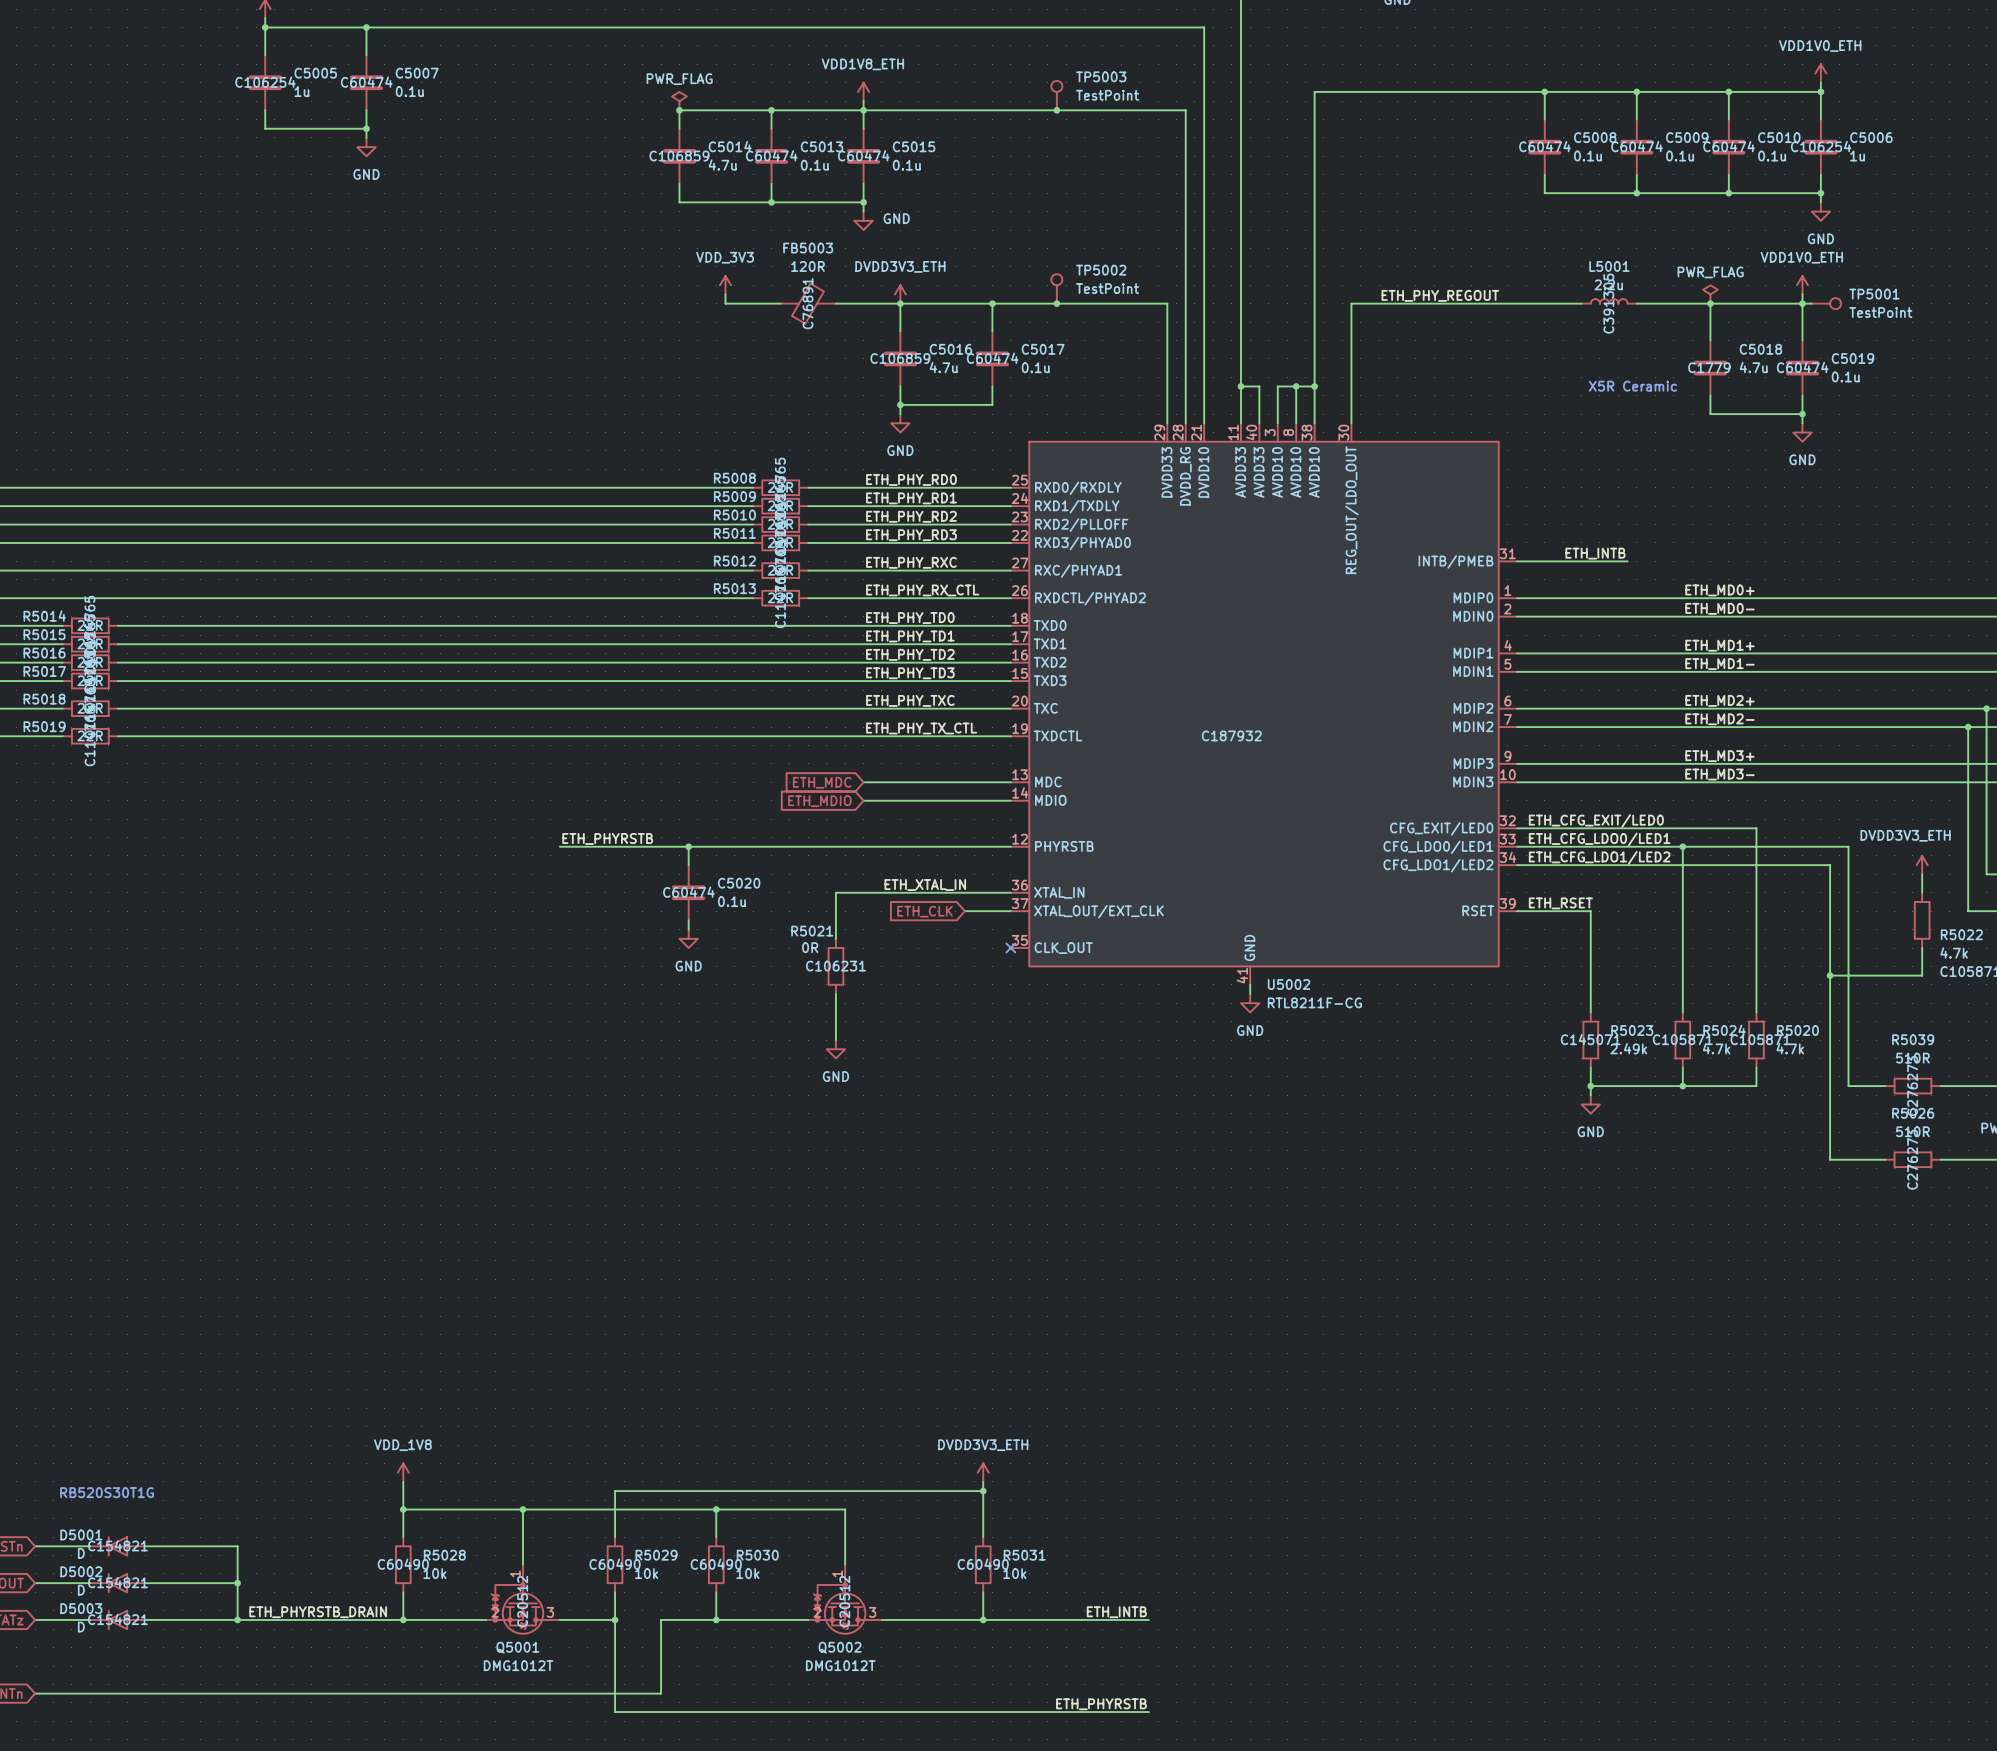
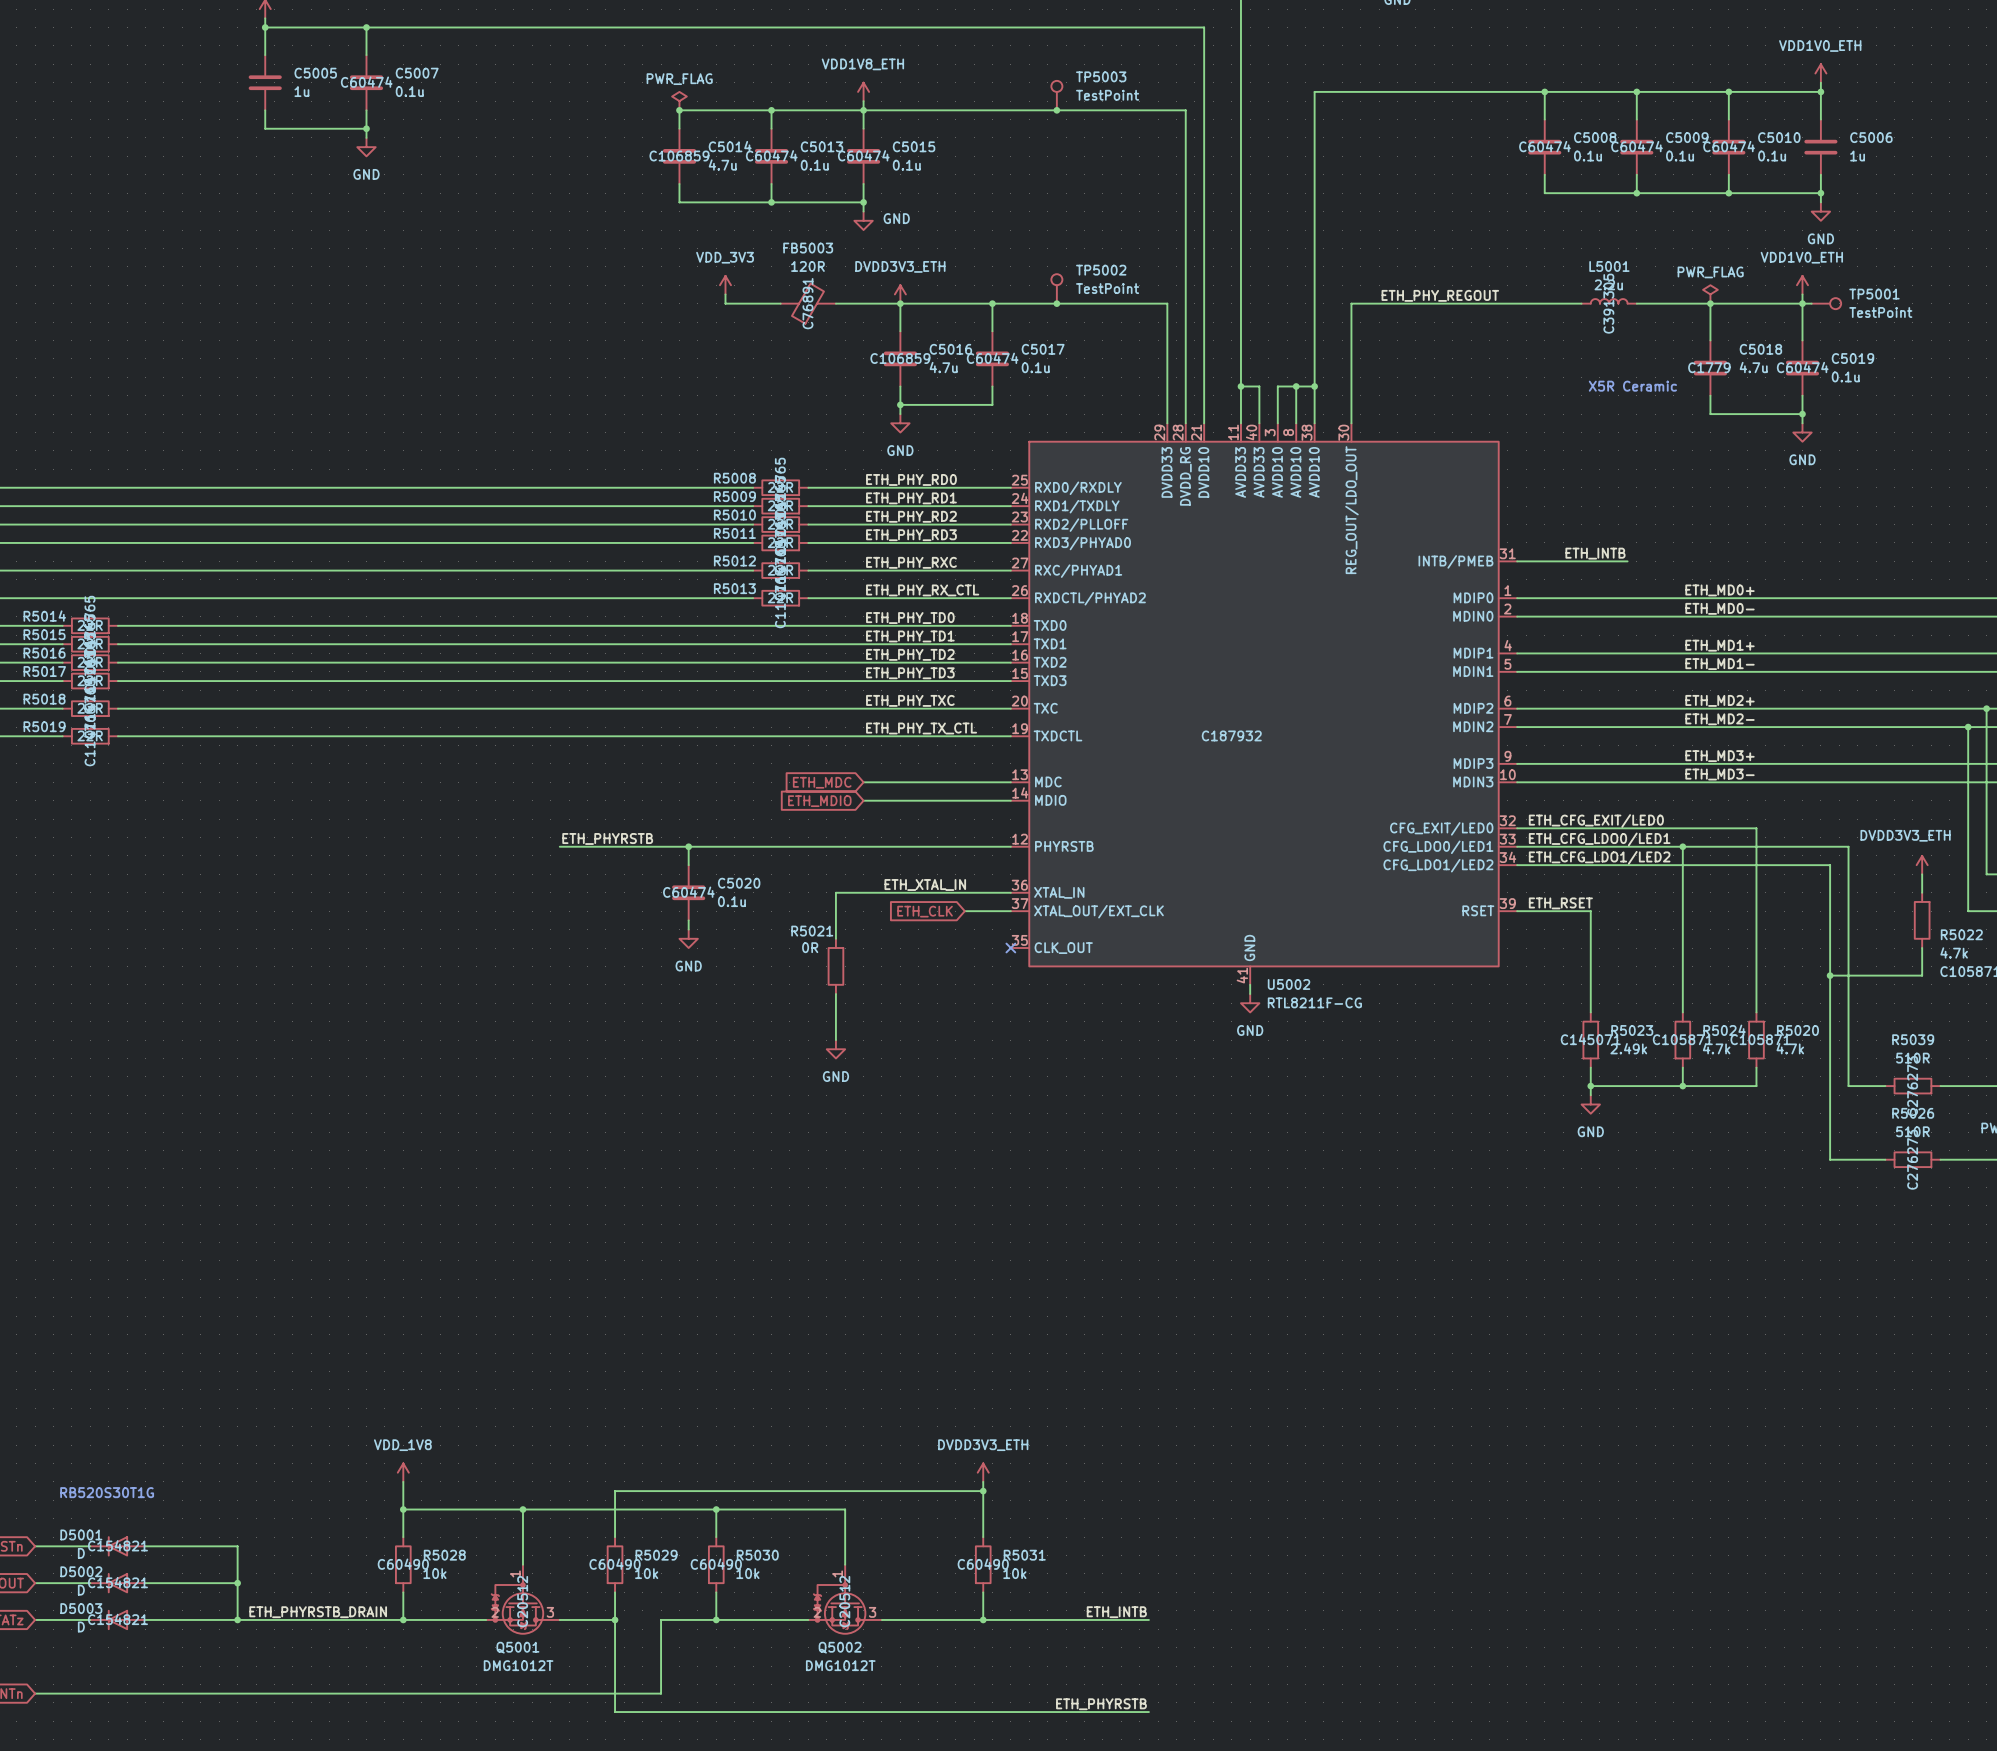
C5005 text: C106254 (265, 82) -> none
C5006 text: C106254 (1821, 146) -> none
R5021 text: C106231 (835, 966) -> none

